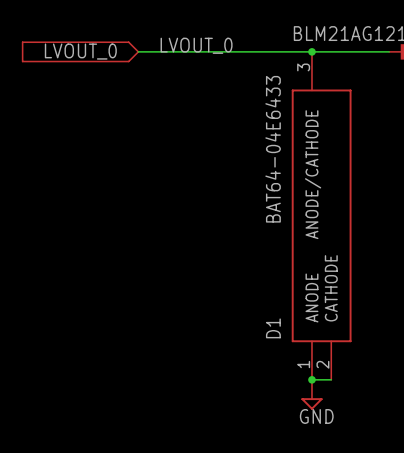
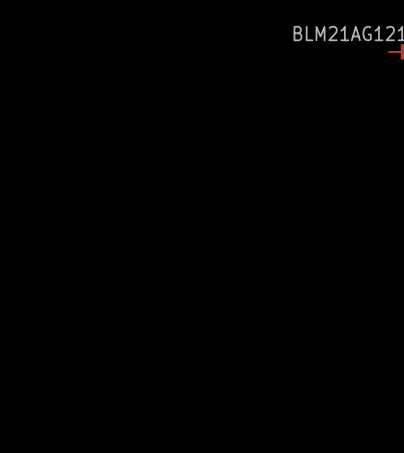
label: LVOUT_0 (196, 45) -> none
part: (80, 51) -> none
wire: (138, 51) (389, 51) -> none
junction: (311, 51) -> none
D1: BAT64-04E6433 (321, 215) -> none
wire: (311, 379) (331, 379) -> none
junction: (311, 379) -> none
power symbol: GND (311, 394) -> none

